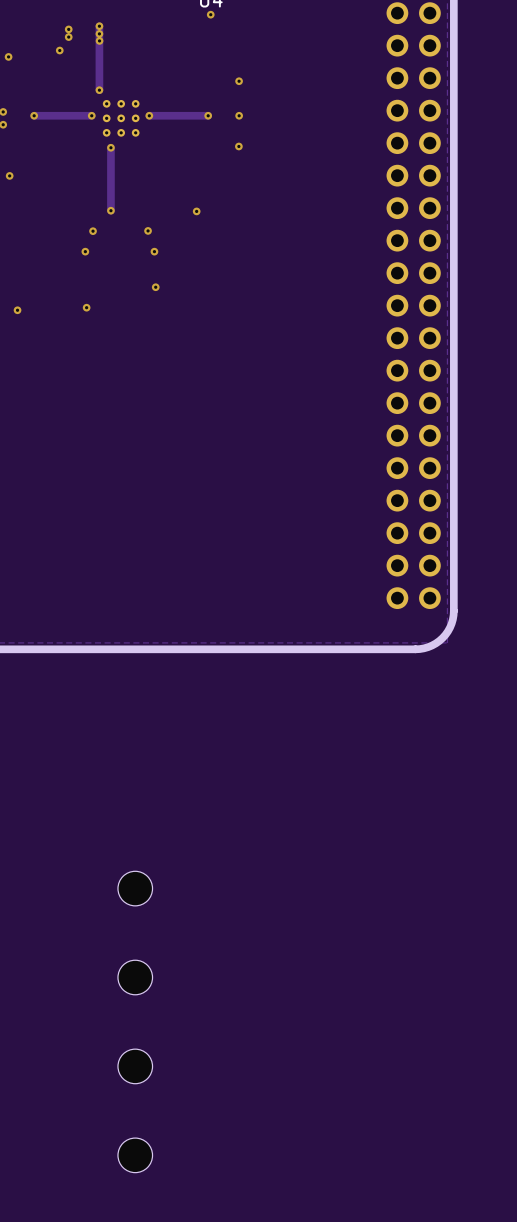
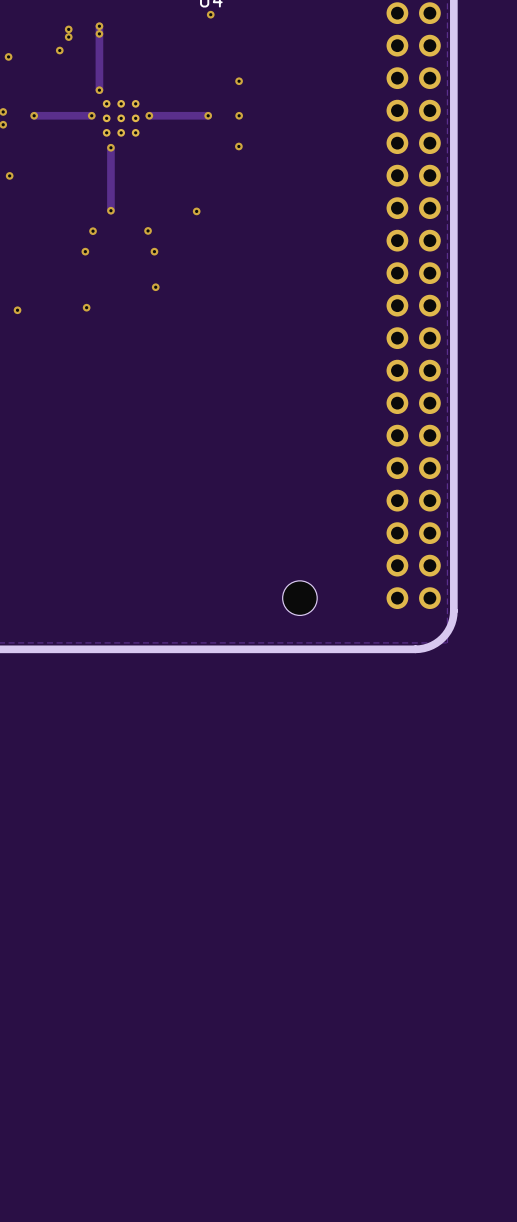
via: (99, 40) -> none
part: none -> (299, 598)
part: (135, 888) -> none
part: (135, 977) -> none
part: (135, 1066) -> none
part: (135, 1155) -> none

